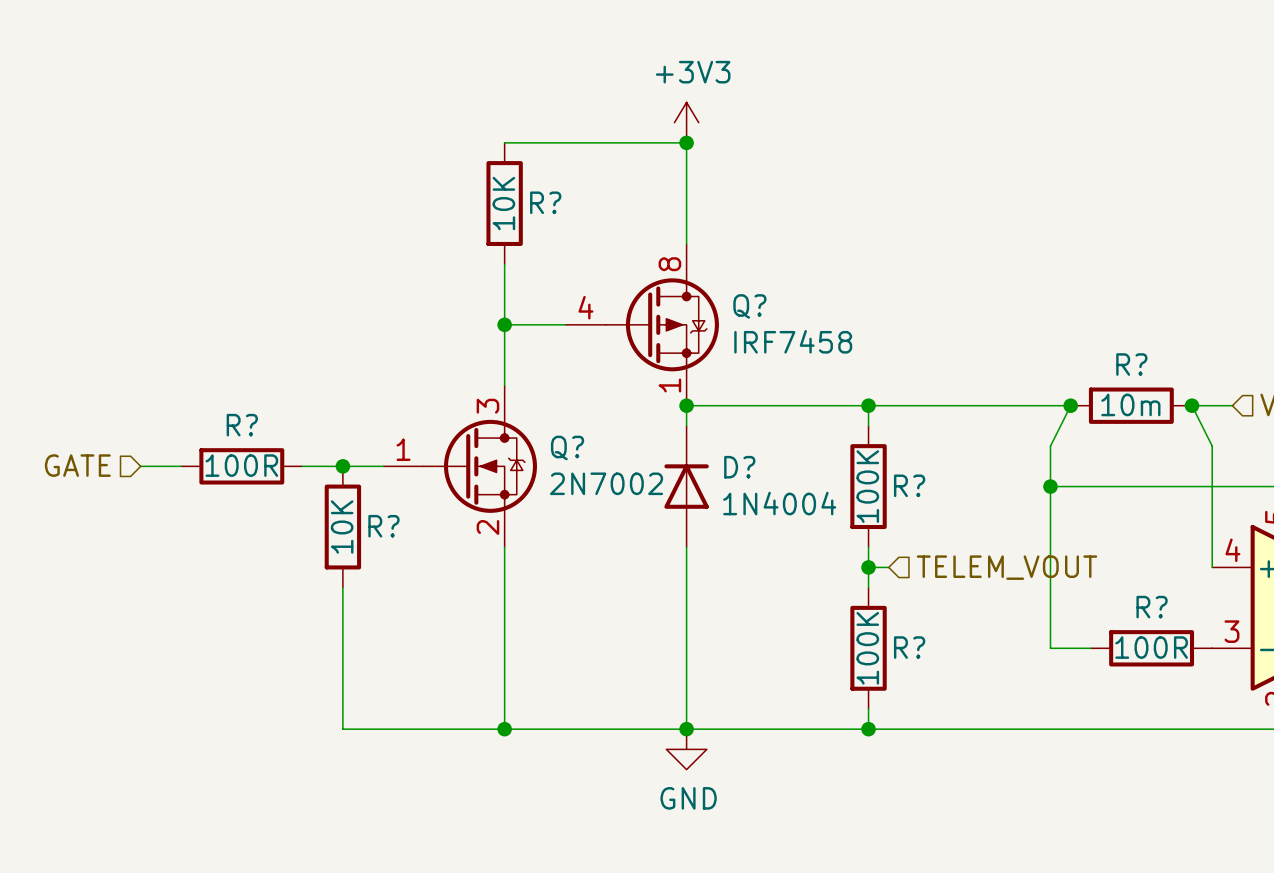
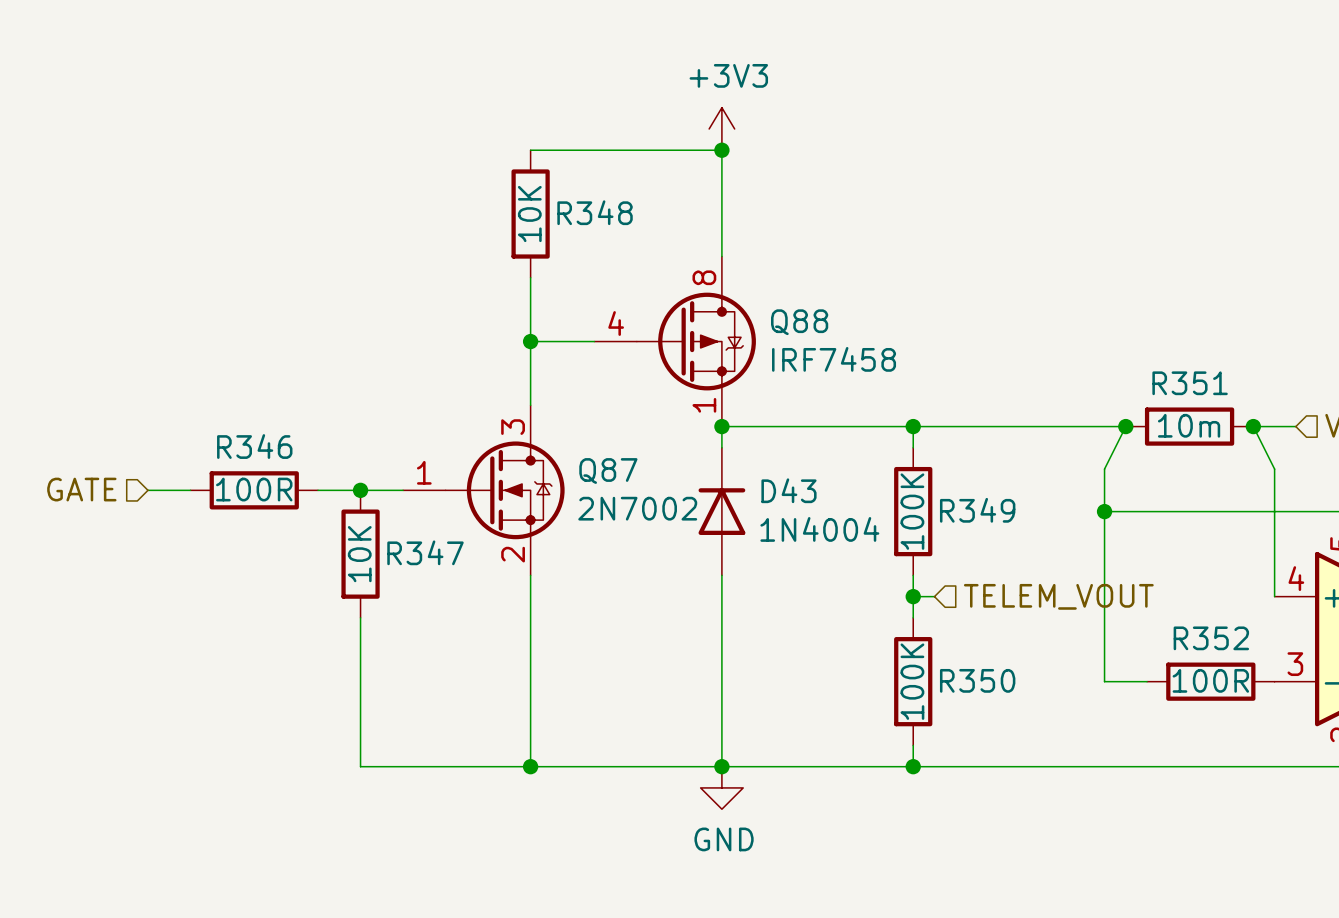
R? name: R? (545, 202) -> R348 (595, 212)
Q? name: Q? (749, 306) -> Q88 (799, 322)
R? name: R? (1131, 364) -> R351 (1190, 383)
R? name: R? (242, 425) -> R346 (254, 446)
Q? name: Q? (567, 447) -> Q87 (608, 471)
D? name: D? (739, 467) -> D43 (788, 490)
R? name: R? (909, 485) -> R349 (977, 510)
R? name: R? (383, 526) -> R347 (425, 552)
R? name: R? (1152, 607) -> R352 (1211, 638)
R? name: R? (909, 647) -> R350 (977, 680)

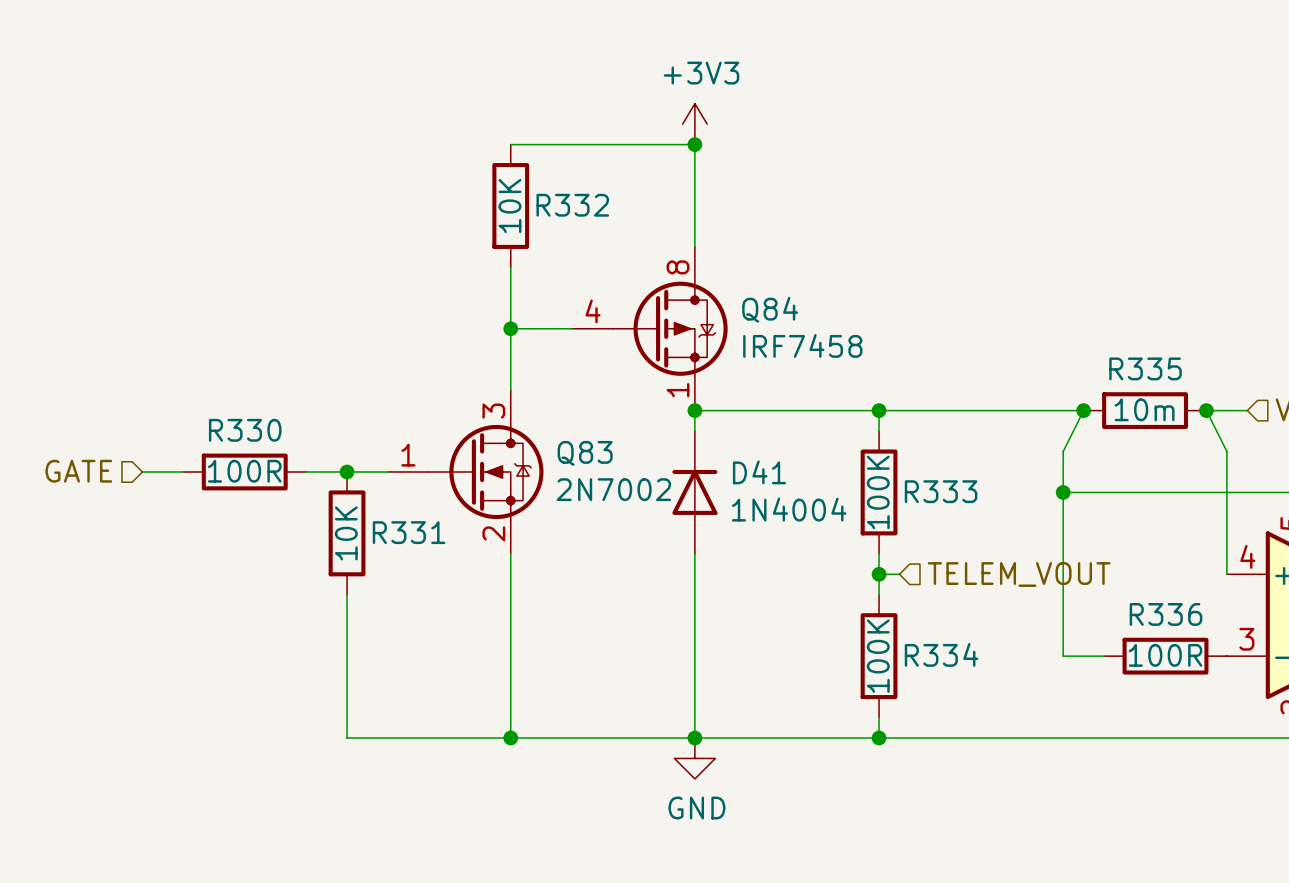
R348 name: R348 (595, 212) -> R332 (572, 205)
Q88 name: Q88 (799, 322) -> Q84 (770, 309)
R351 name: R351 (1190, 383) -> R335 (1145, 368)
R346 name: R346 (254, 446) -> R330 (245, 430)
Q87 name: Q87 (608, 471) -> Q83 (585, 453)
D43 name: D43 (788, 490) -> D41 (759, 472)
R349 name: R349 (977, 510) -> R333 (941, 491)
R347 name: R347 (425, 552) -> R331 (409, 532)
R352 name: R352 (1211, 638) -> R336 (1166, 614)
R350 name: R350 (977, 680) -> R334 (941, 654)

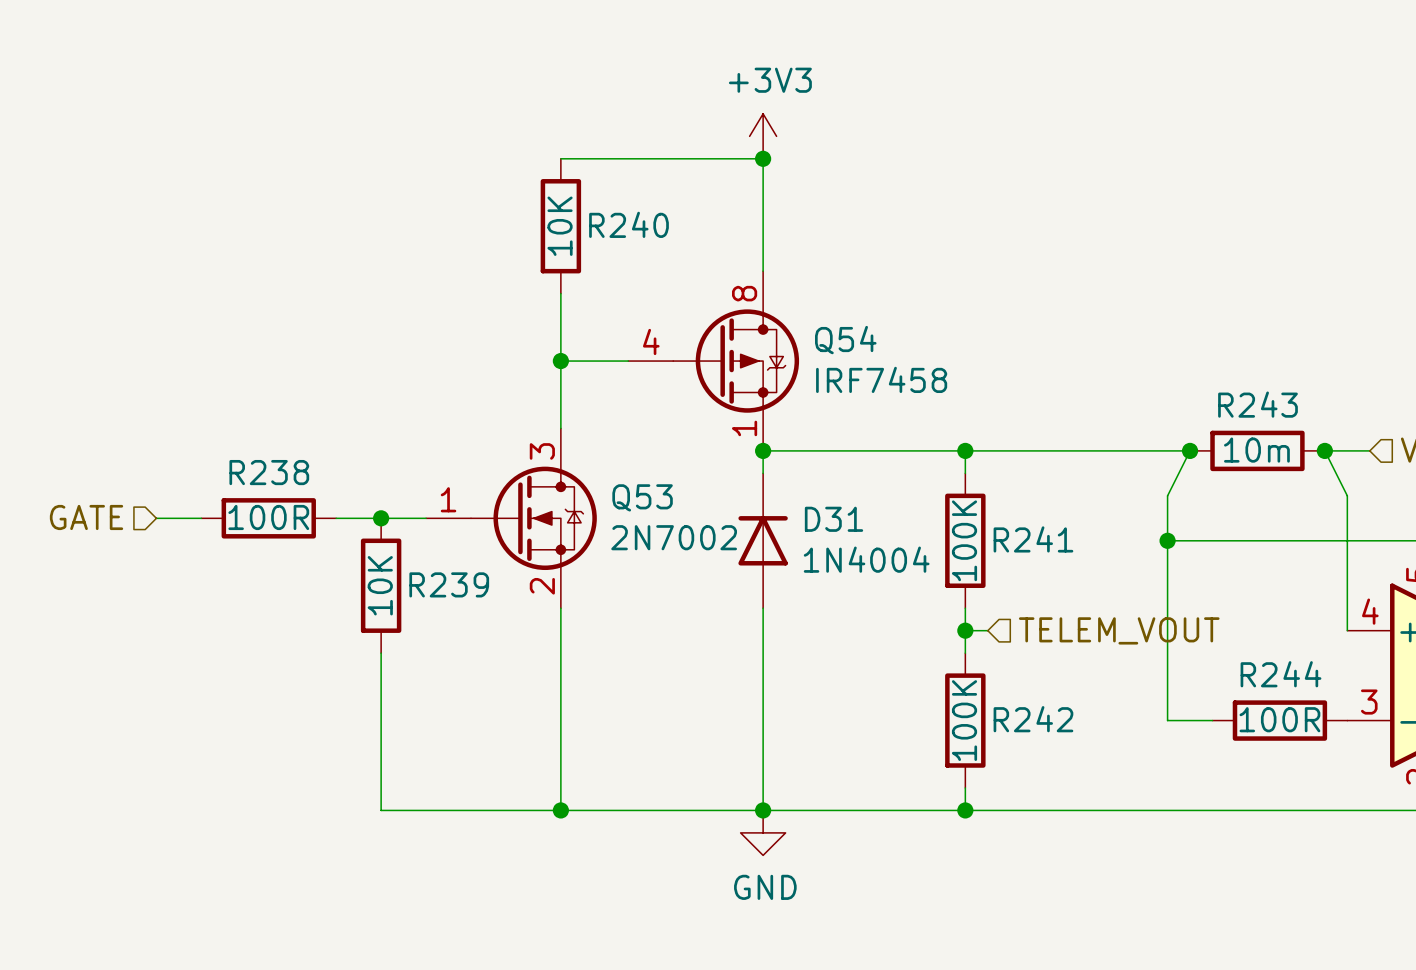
R332 name: R332 (572, 205) -> R240 (628, 224)
Q84 name: Q84 (770, 309) -> Q54 (845, 340)
R335 name: R335 (1145, 368) -> R243 (1257, 404)
R330 name: R330 (245, 430) -> R238 (269, 472)
Q83 name: Q83 (585, 453) -> Q53 (642, 497)
D41 name: D41 (759, 472) -> D31 (834, 519)
R333 name: R333 (941, 491) -> R241 (1033, 539)
R331 name: R331 (409, 532) -> R239 (449, 584)
R336 name: R336 (1166, 614) -> R244 (1281, 674)
R334 name: R334 (941, 654) -> R242 (1033, 719)

